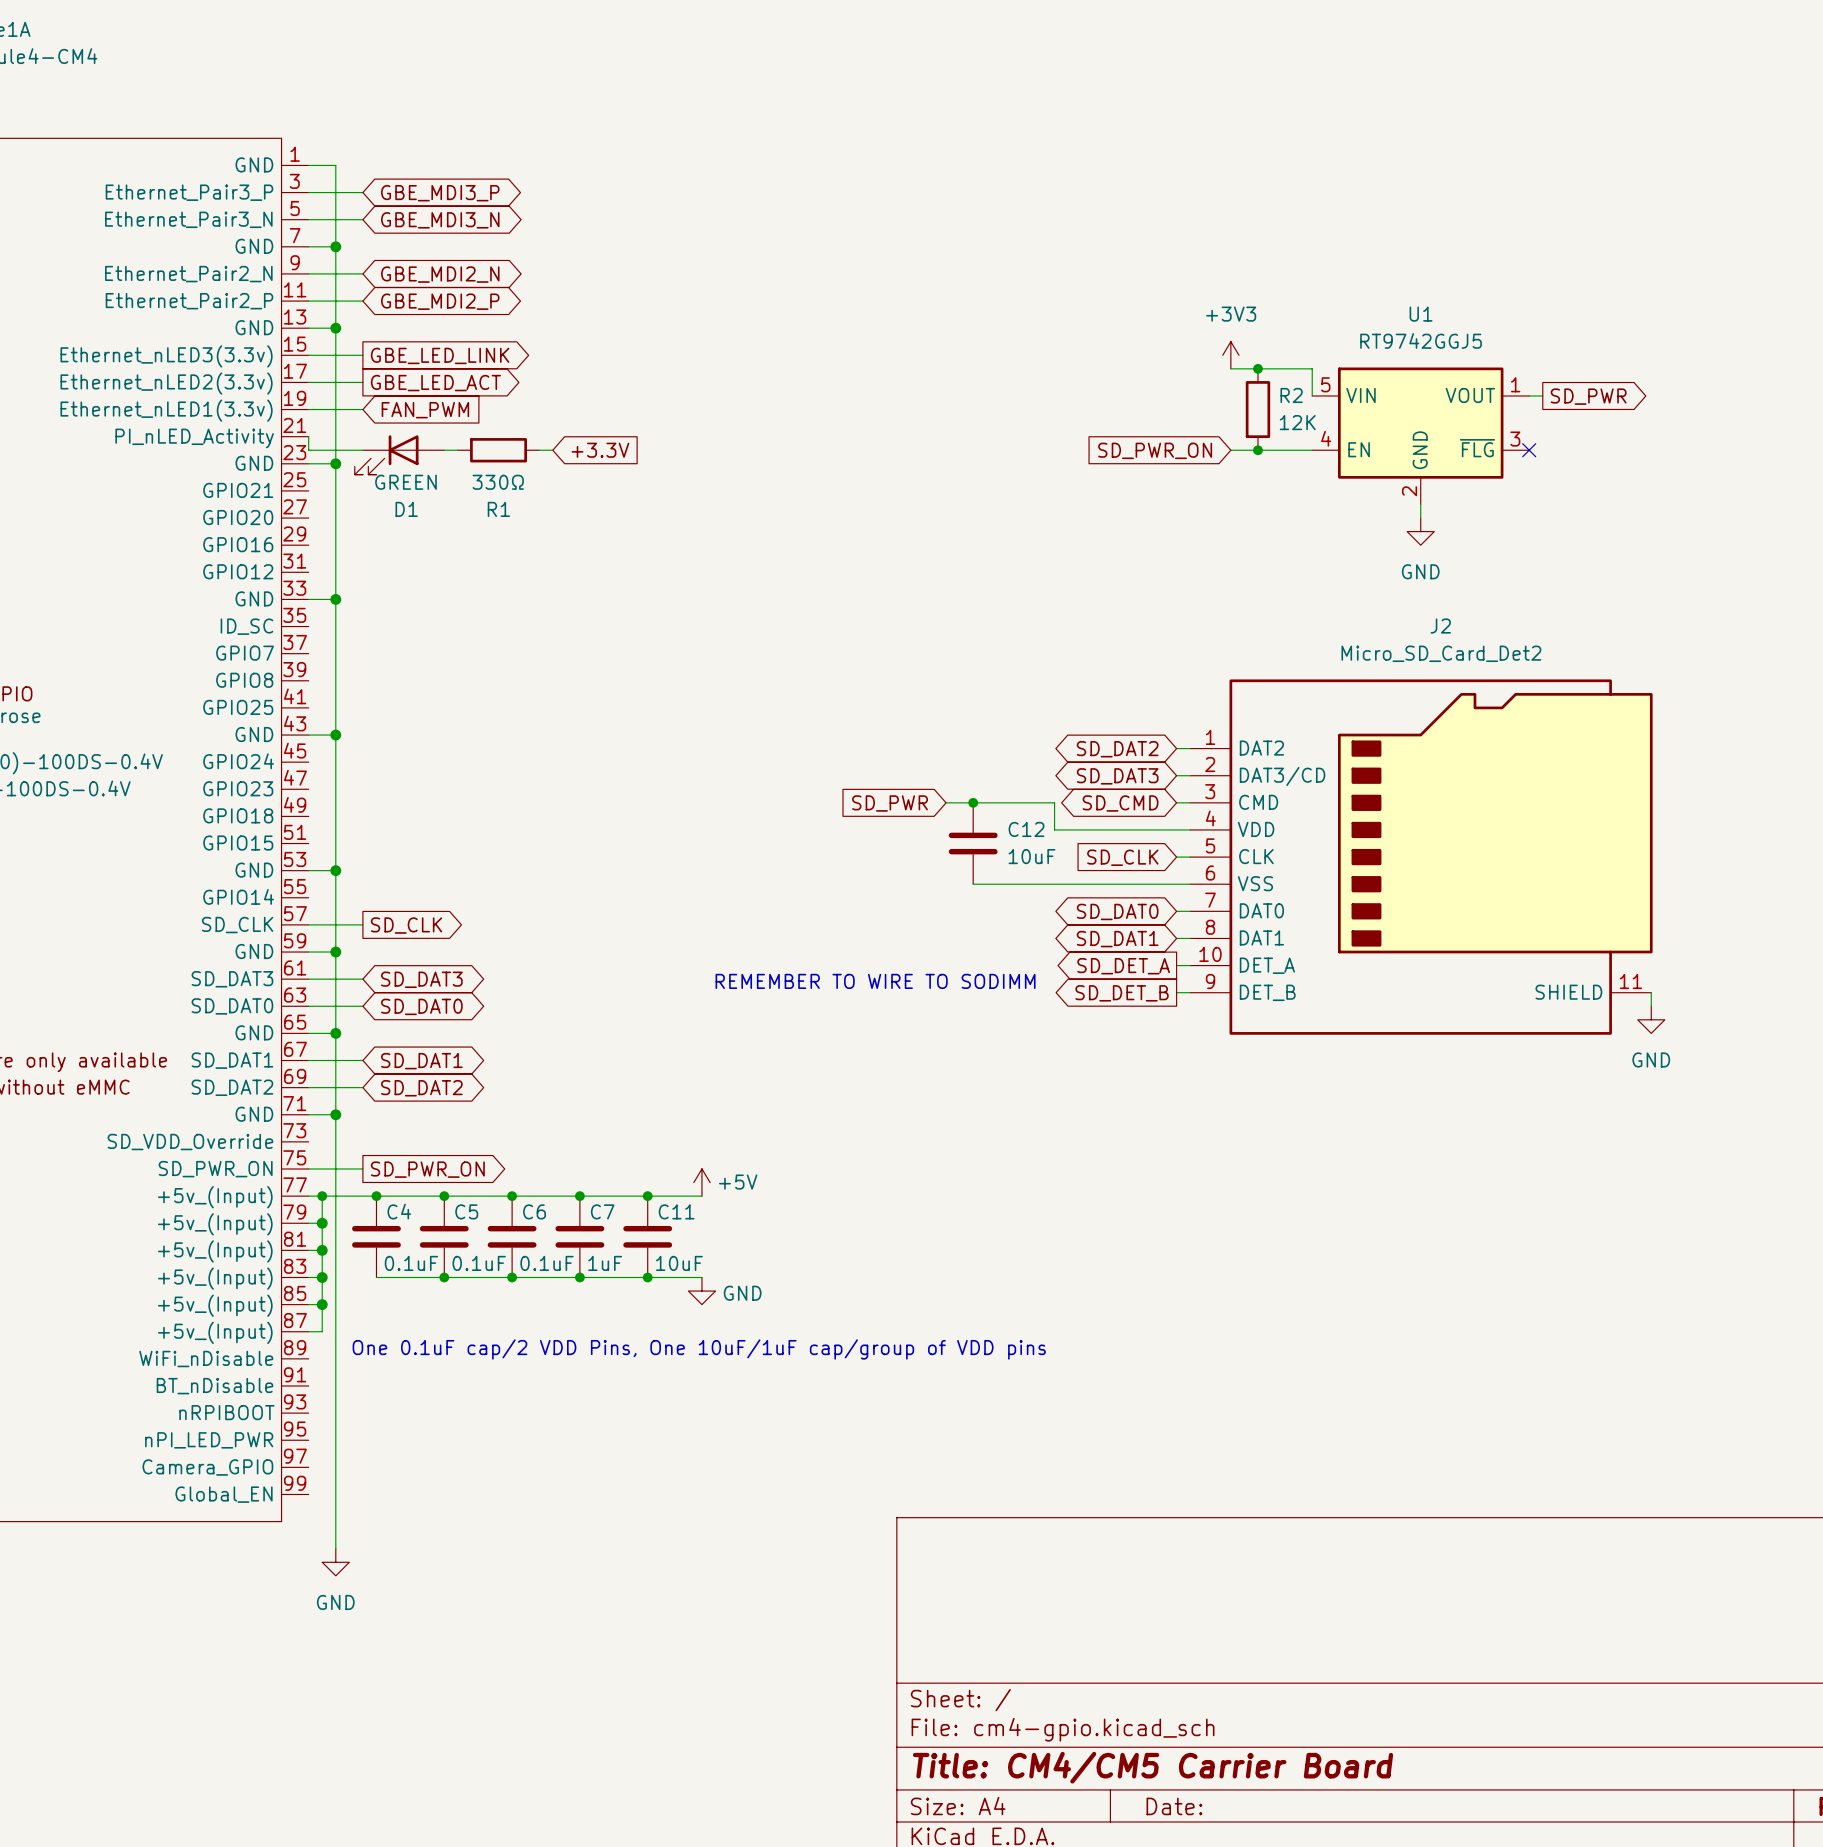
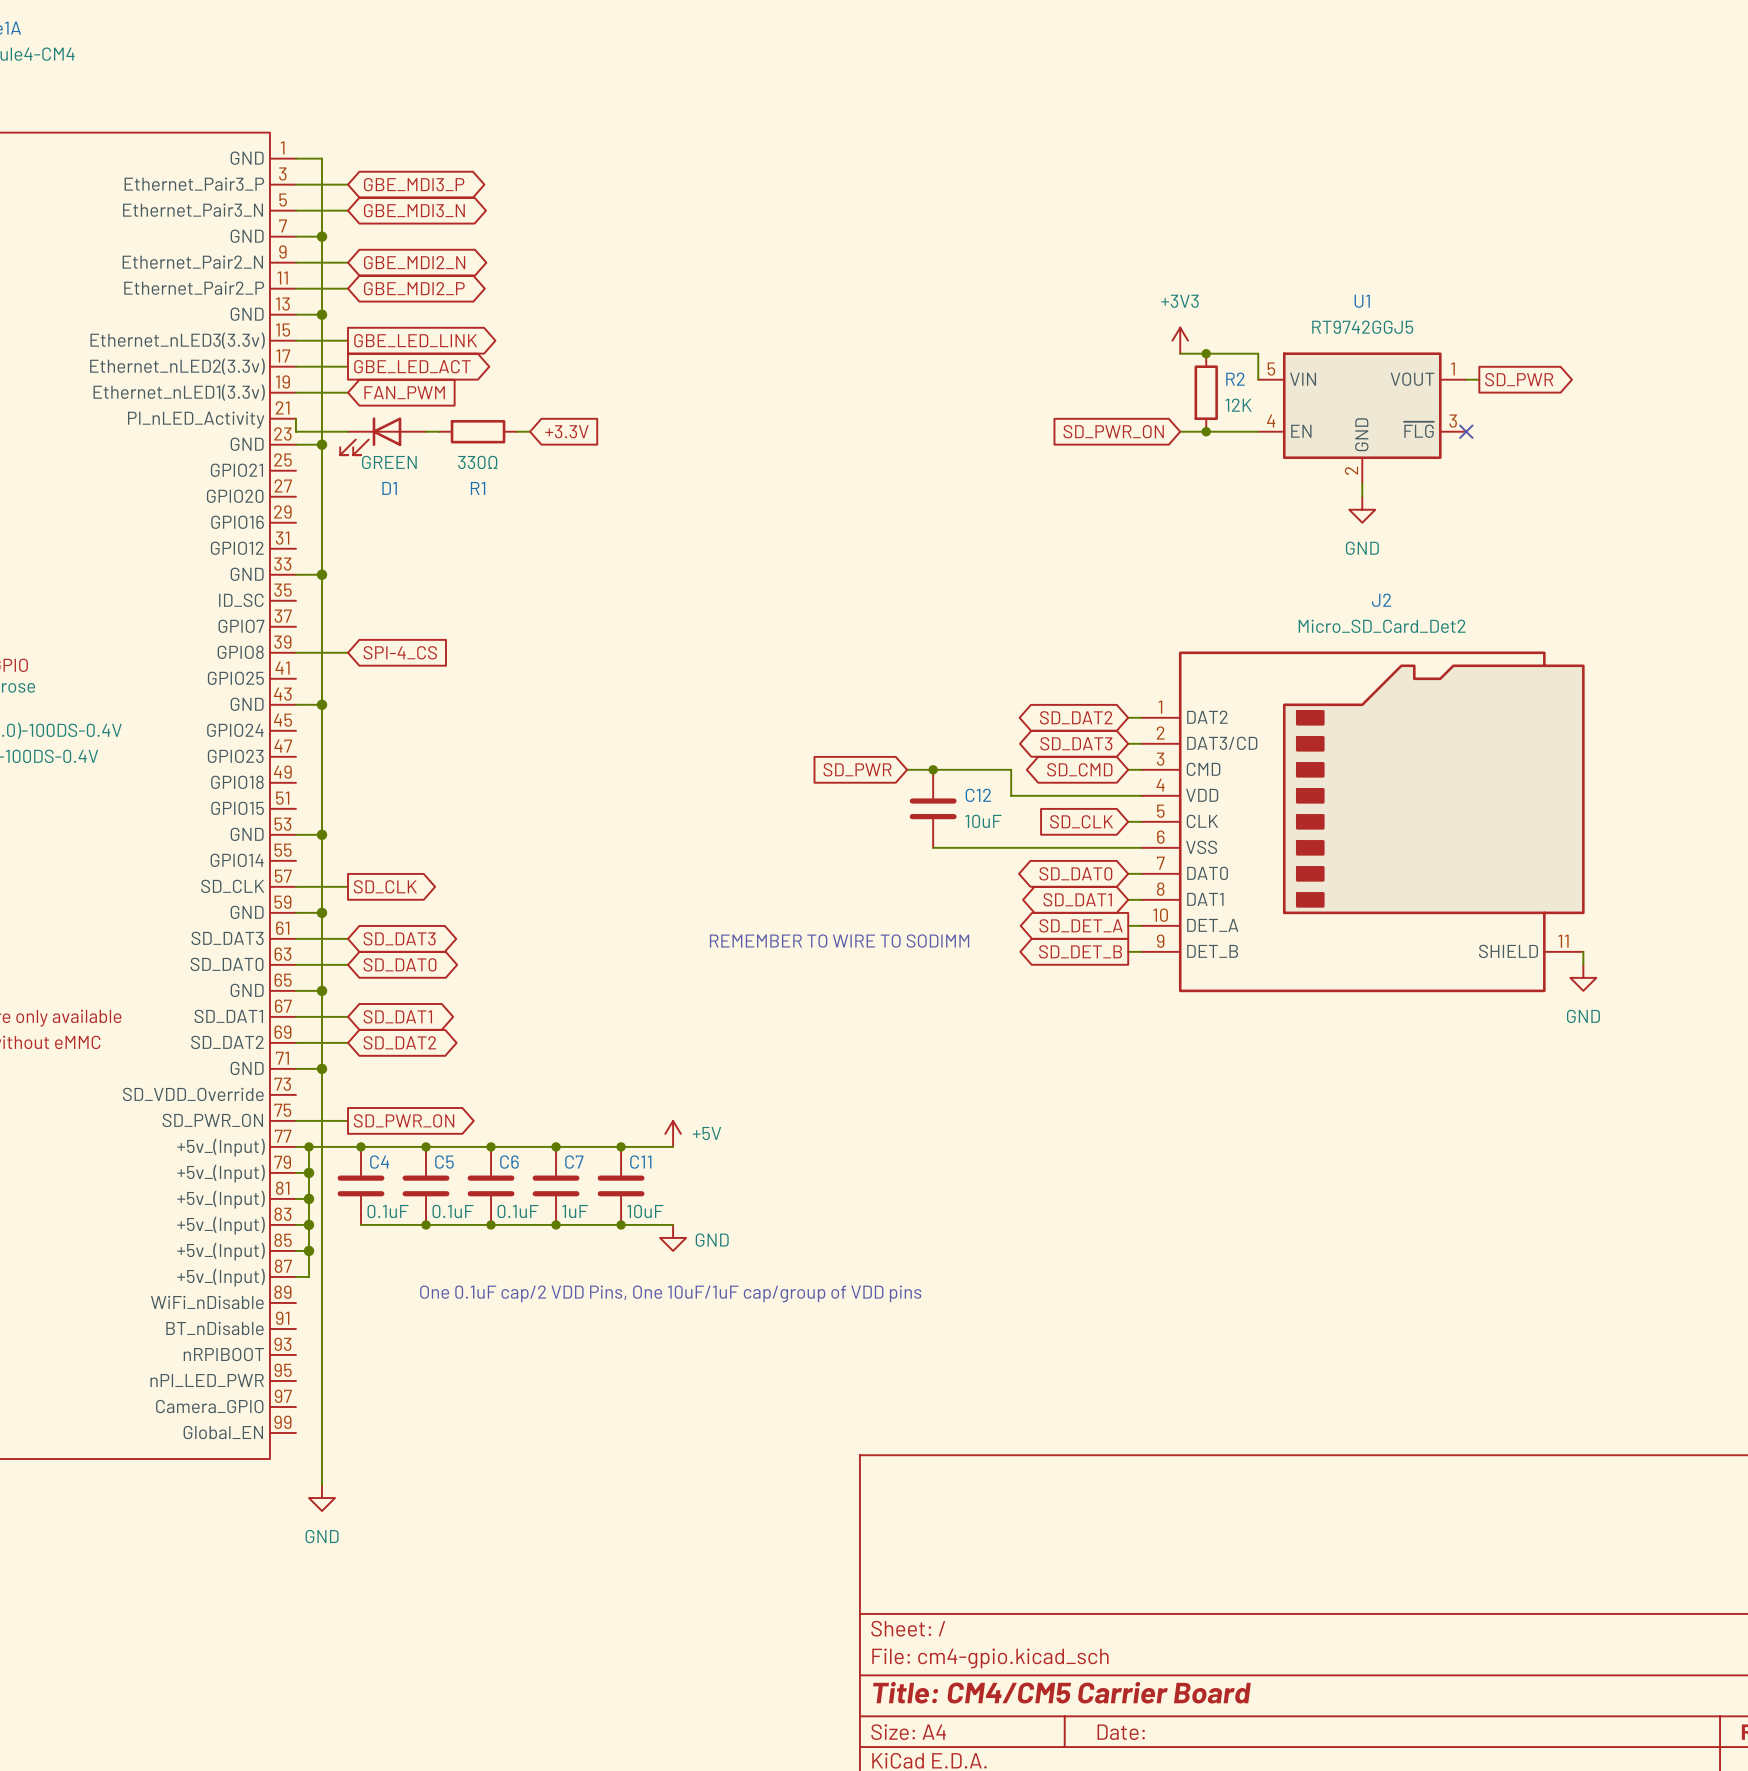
wire: none -> (295, 652) (347, 652)
global label: none -> SPI-4_CS (400, 652)

